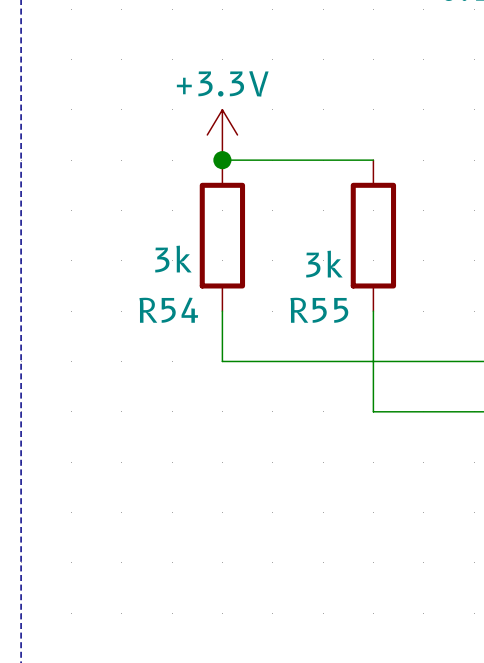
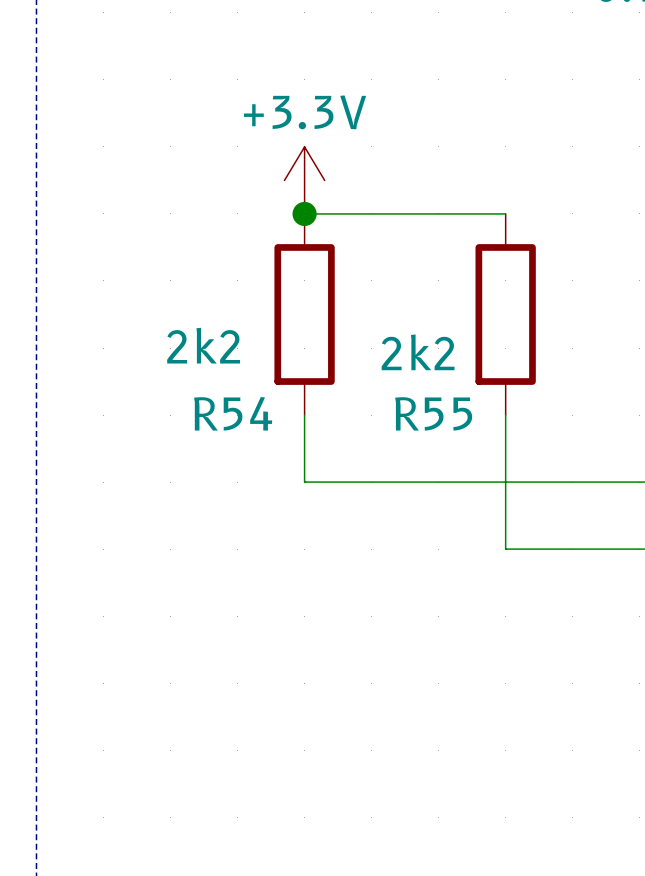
R54 value: 3k (173, 259) -> 2k2 (203, 345)
R55 value: 3k (324, 264) -> 2k2 (418, 352)

